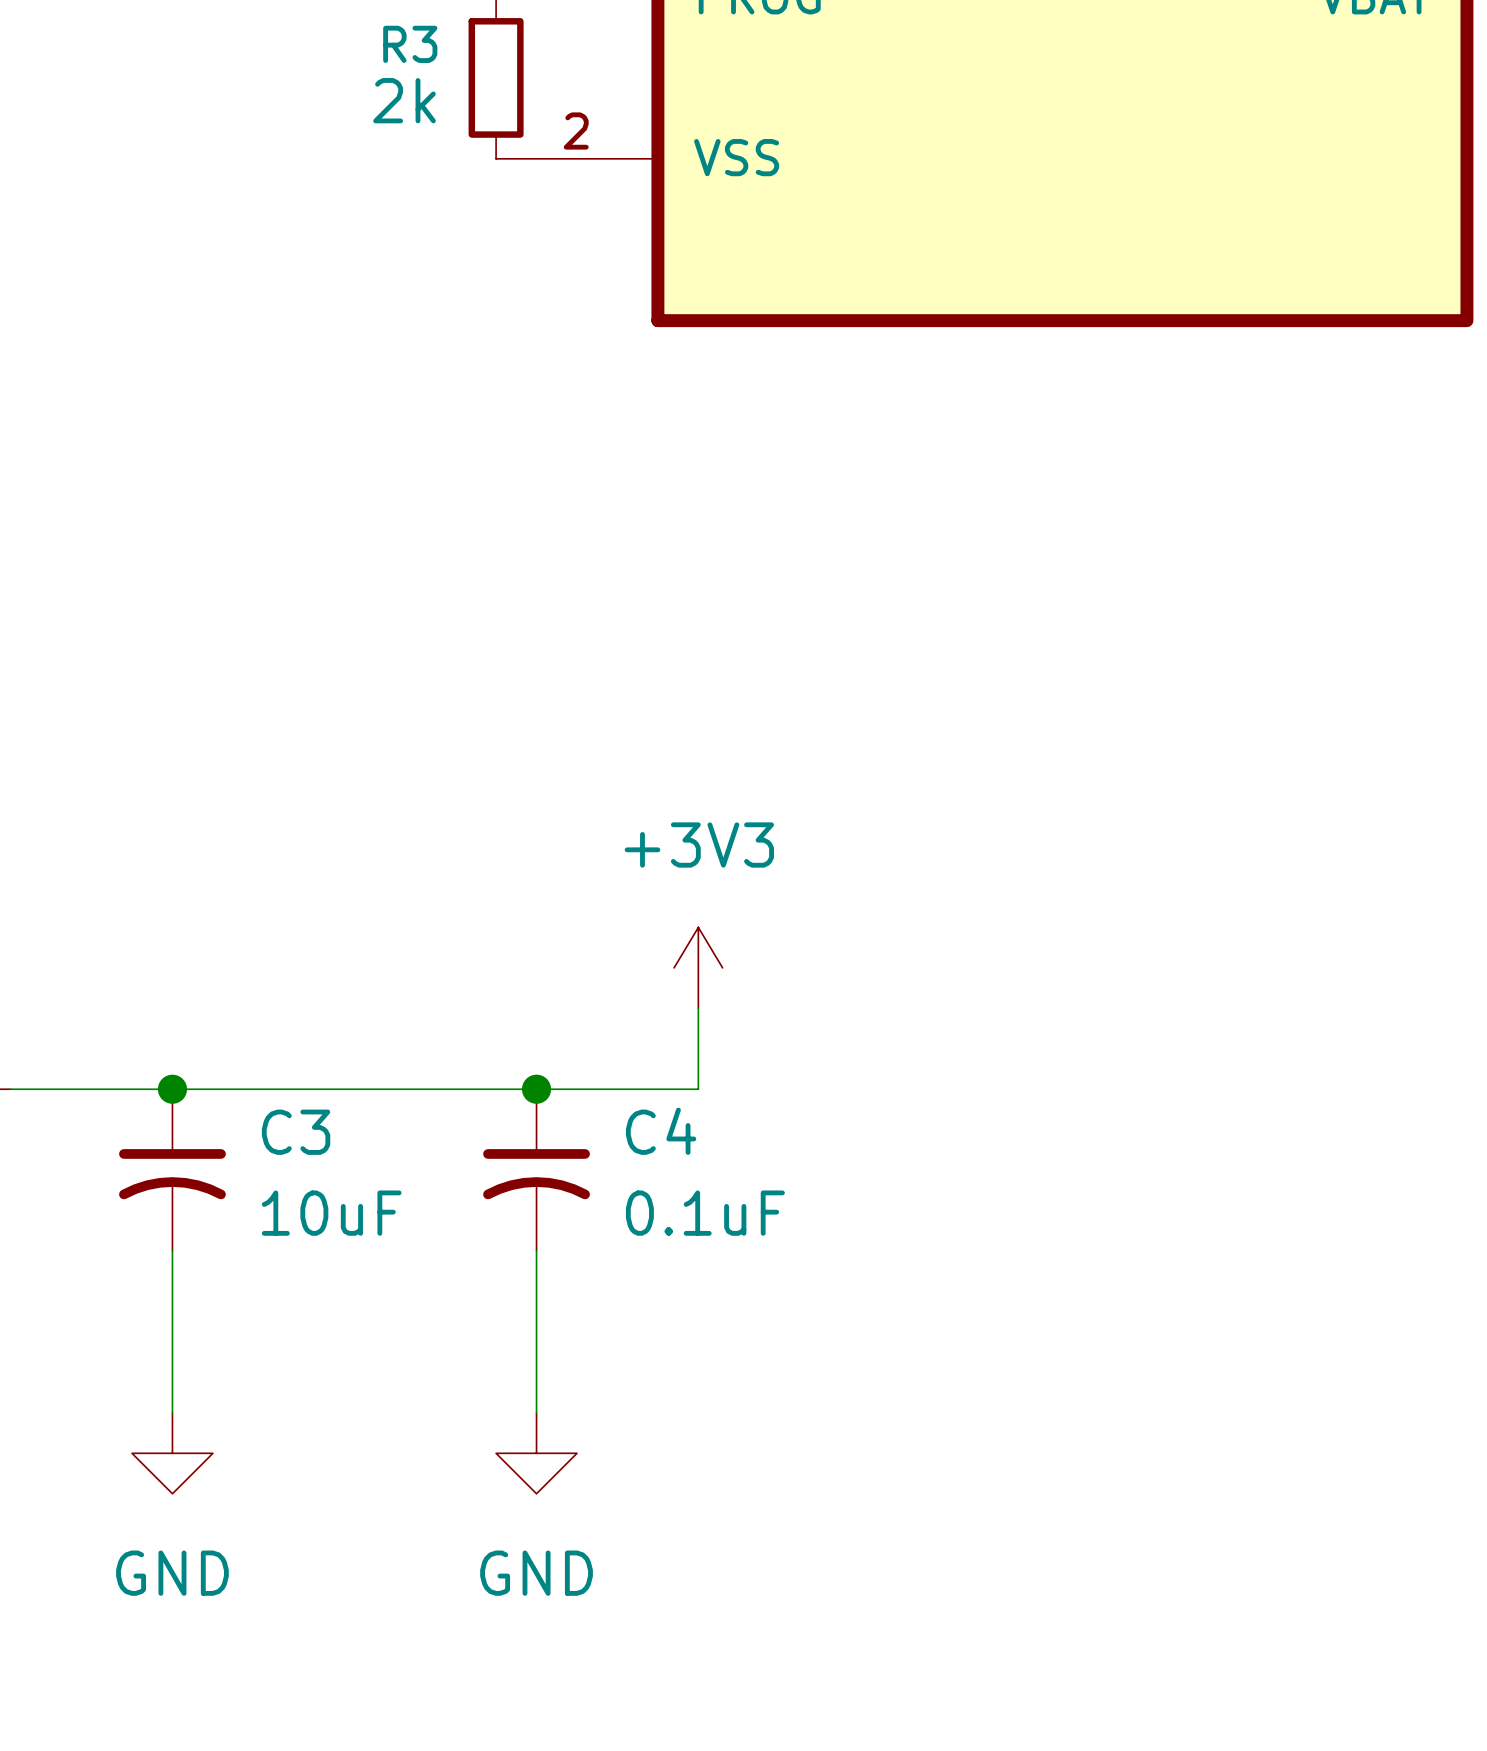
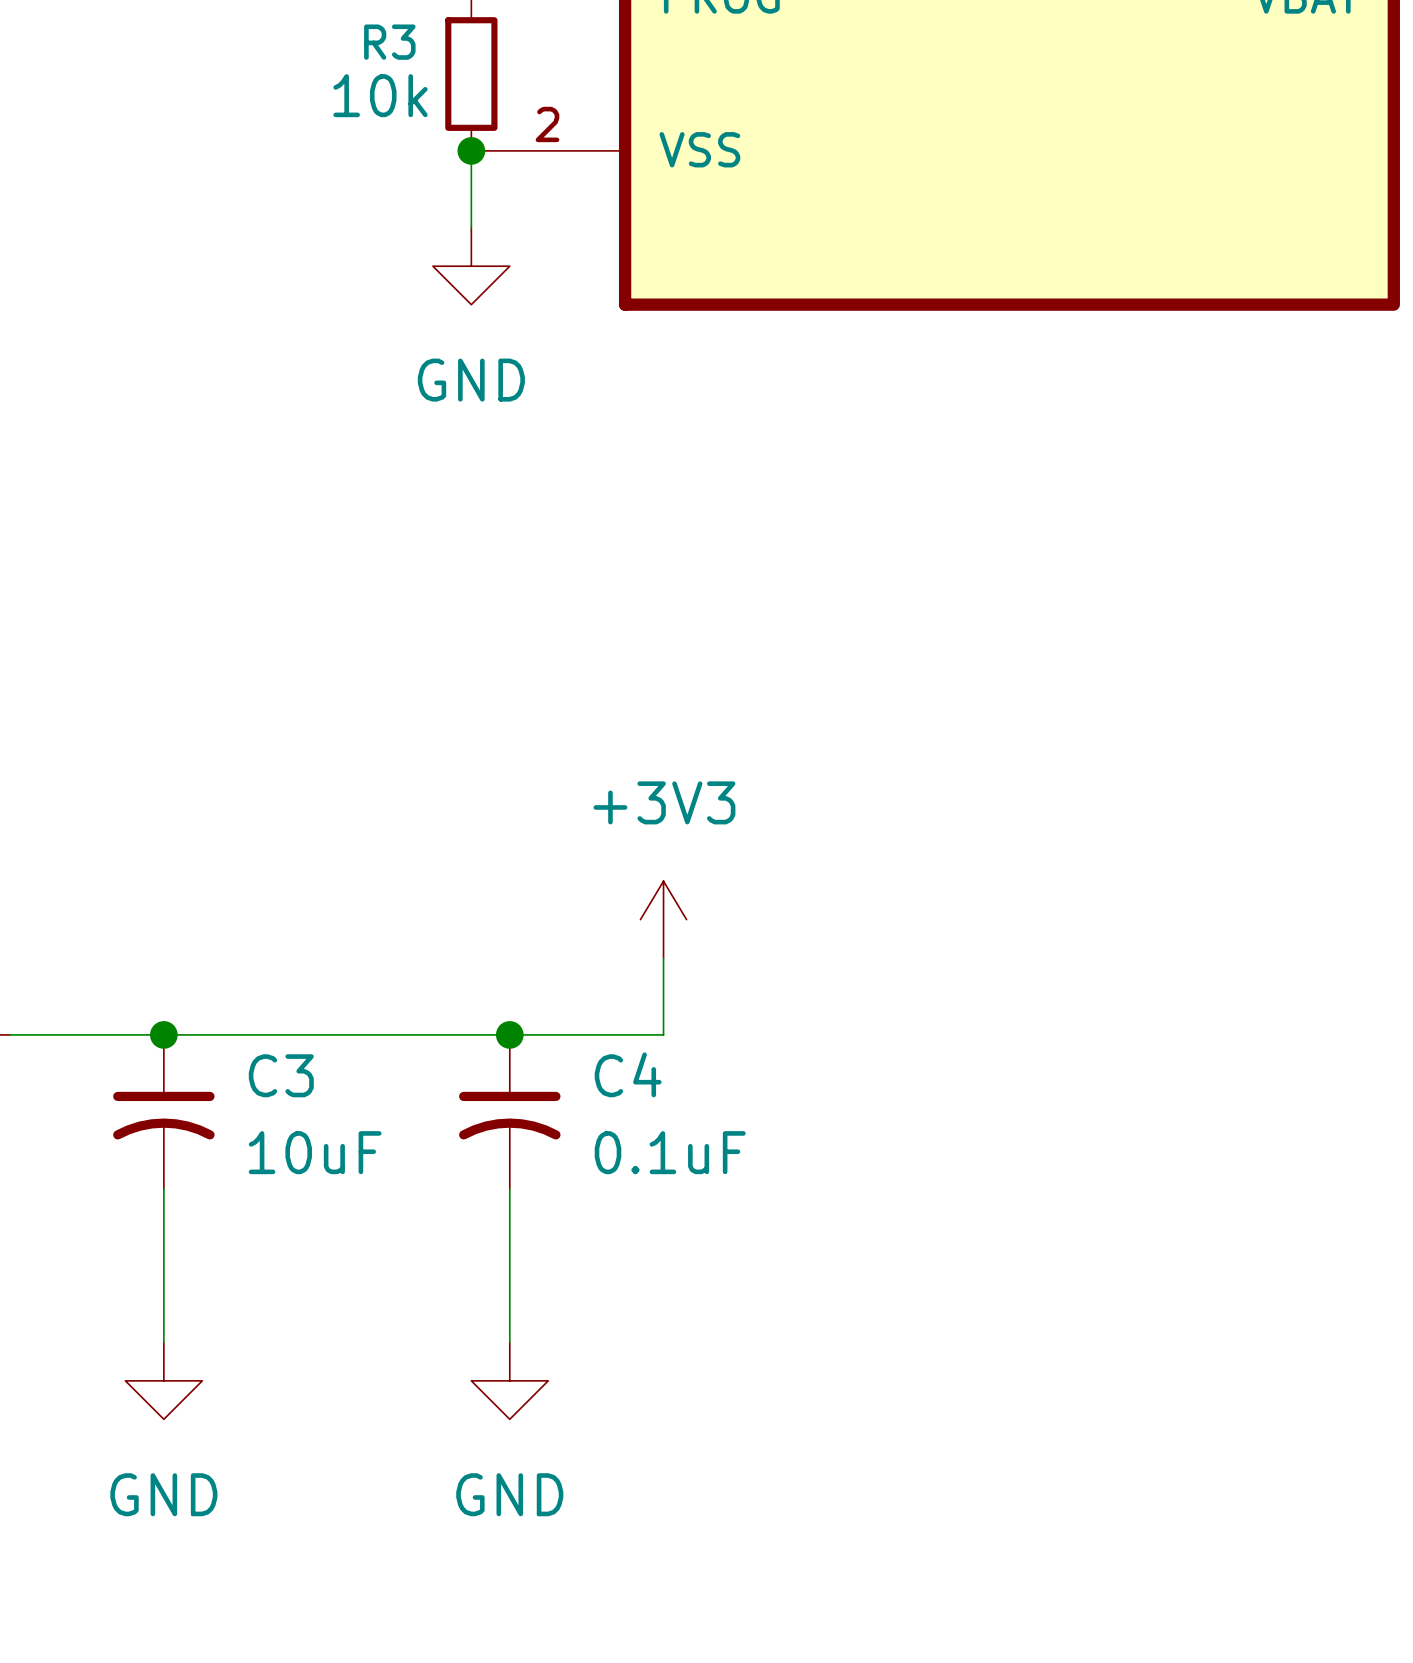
R3 value: 2k (404, 100) -> 10k (380, 95)
wire: none -> (471, 150) (471, 227)
junction: none -> (471, 150)
power symbol: none -> GND (471, 266)

